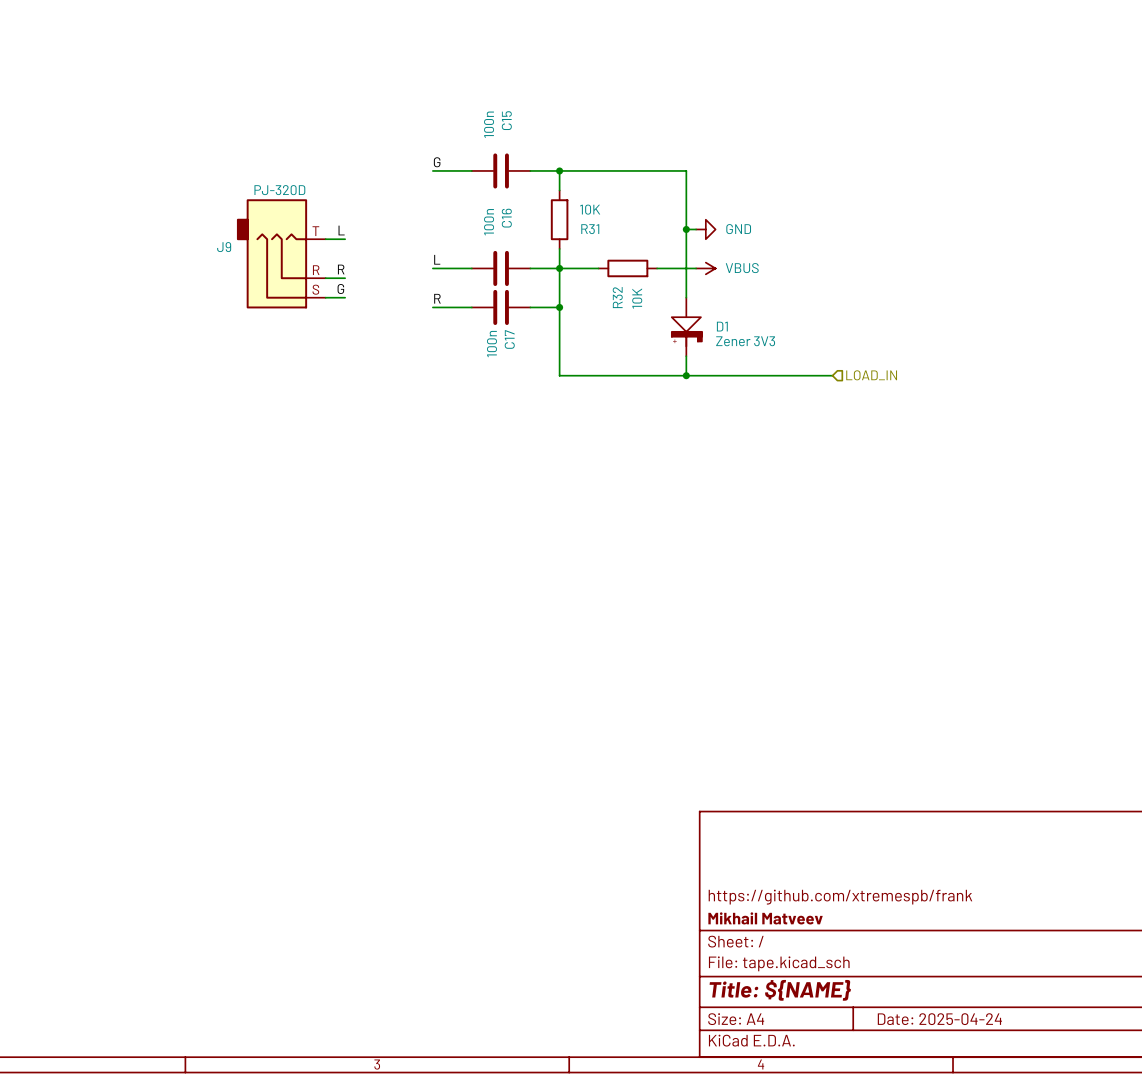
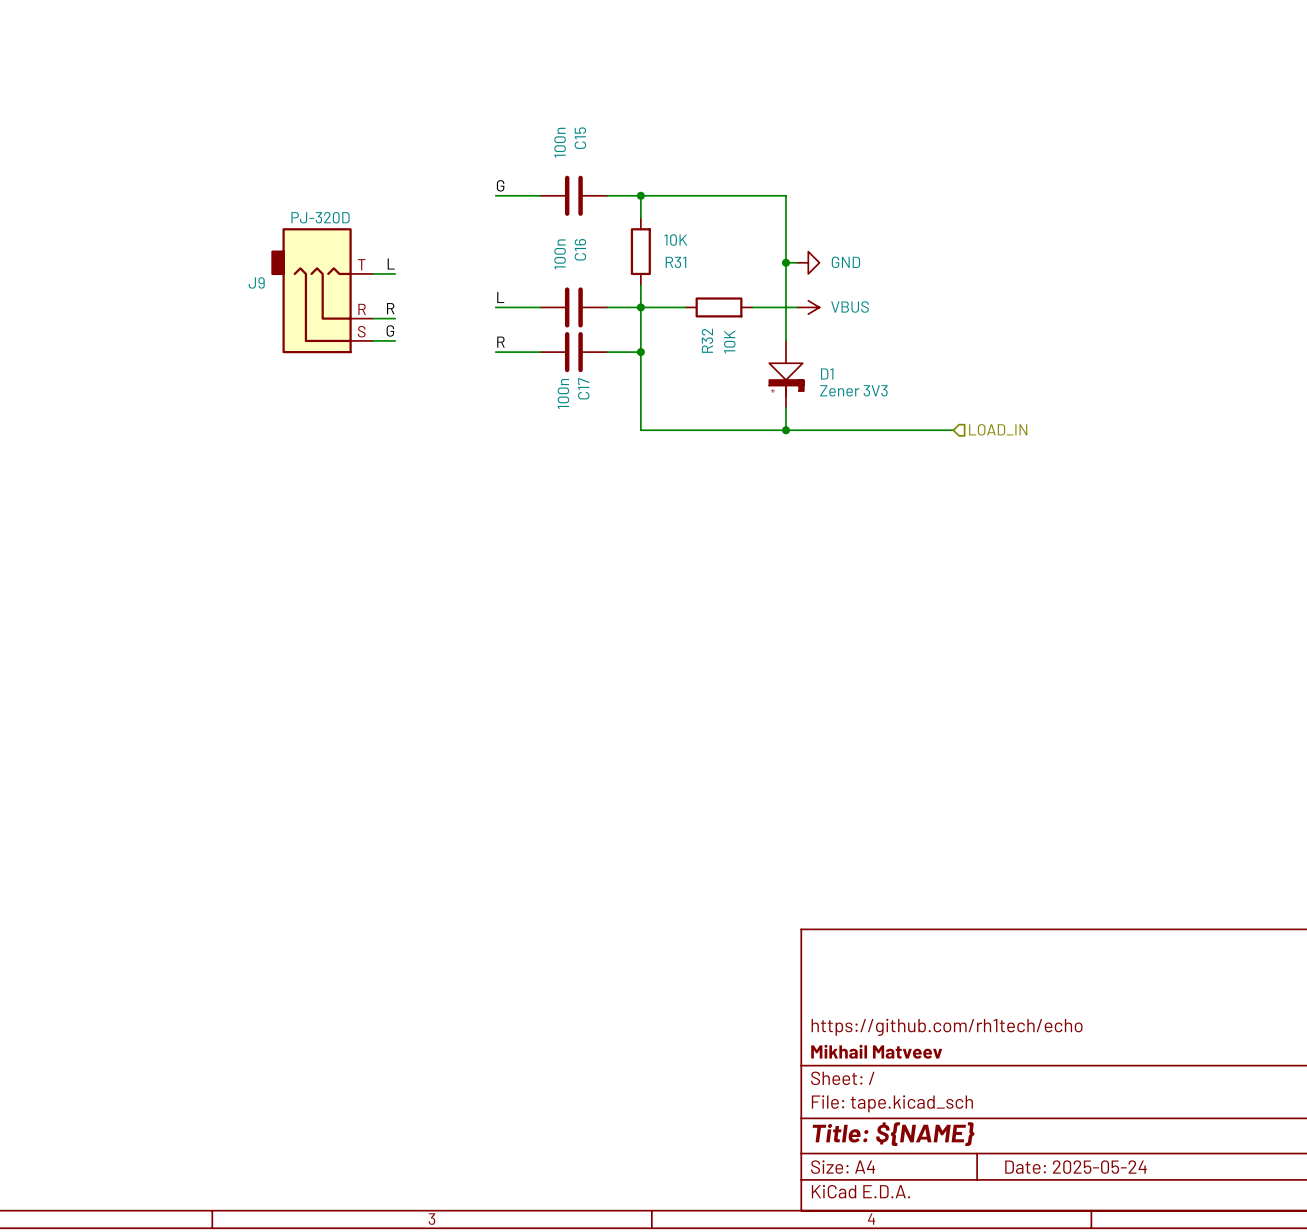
title block: https://github.com/xtremespb/frank (840, 897) -> https://github.com/rh1tech/echo (947, 1027)
title block: Date: 2025-04-24 (939, 1019) -> Date: 2025-05-24 (1076, 1167)

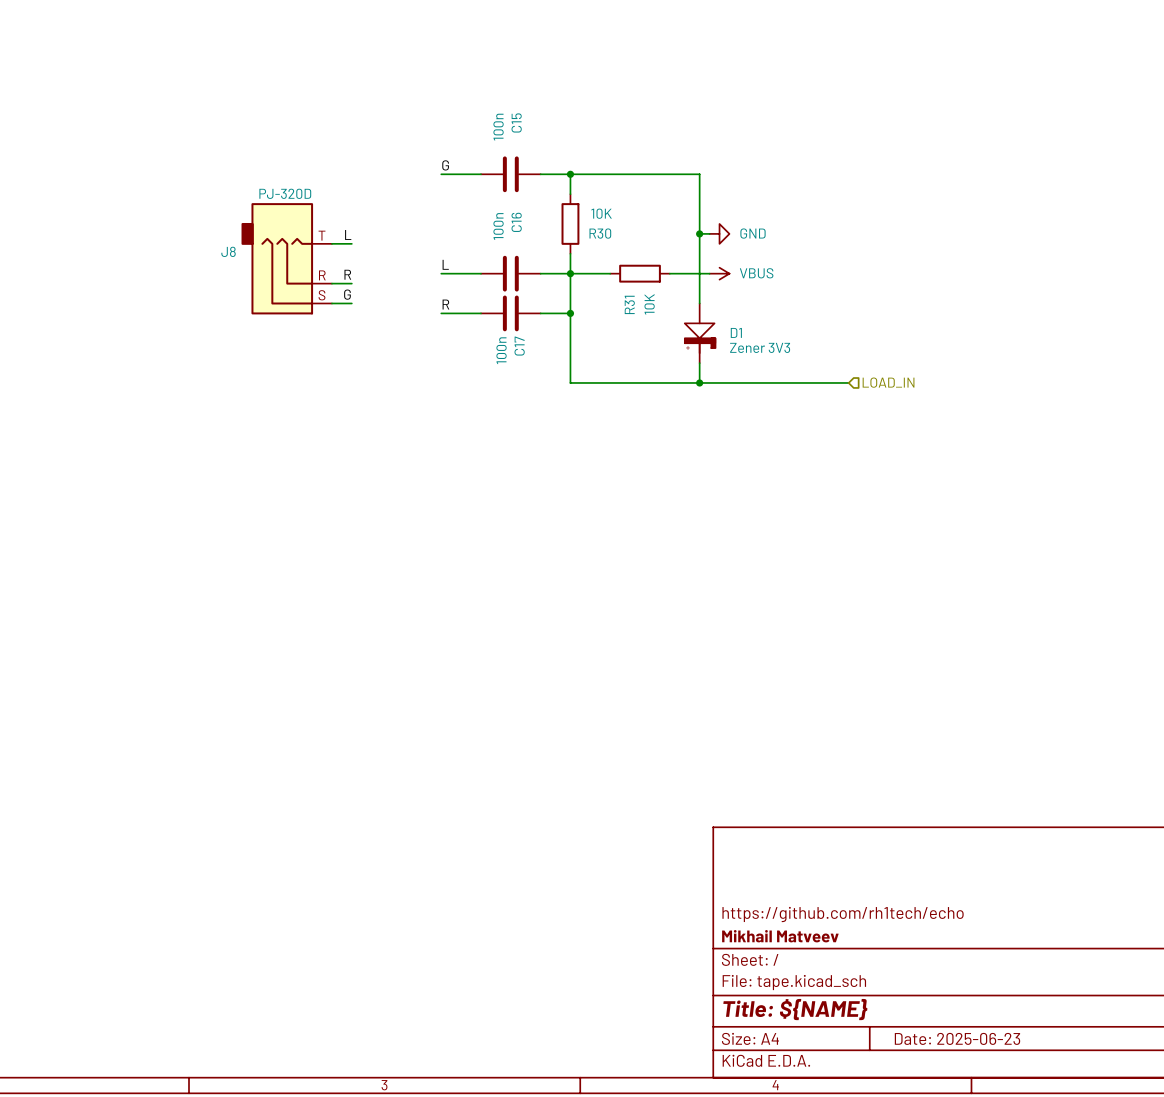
R31 name: R31 (675, 262) -> R30 (600, 233)
J9 name: J9 (256, 282) -> J8 (228, 251)
R32 name: R32 (707, 340) -> R31 (629, 304)
title block: Date: 2025-05-24 (1076, 1167) -> Date: 2025-06-23 (957, 1038)

